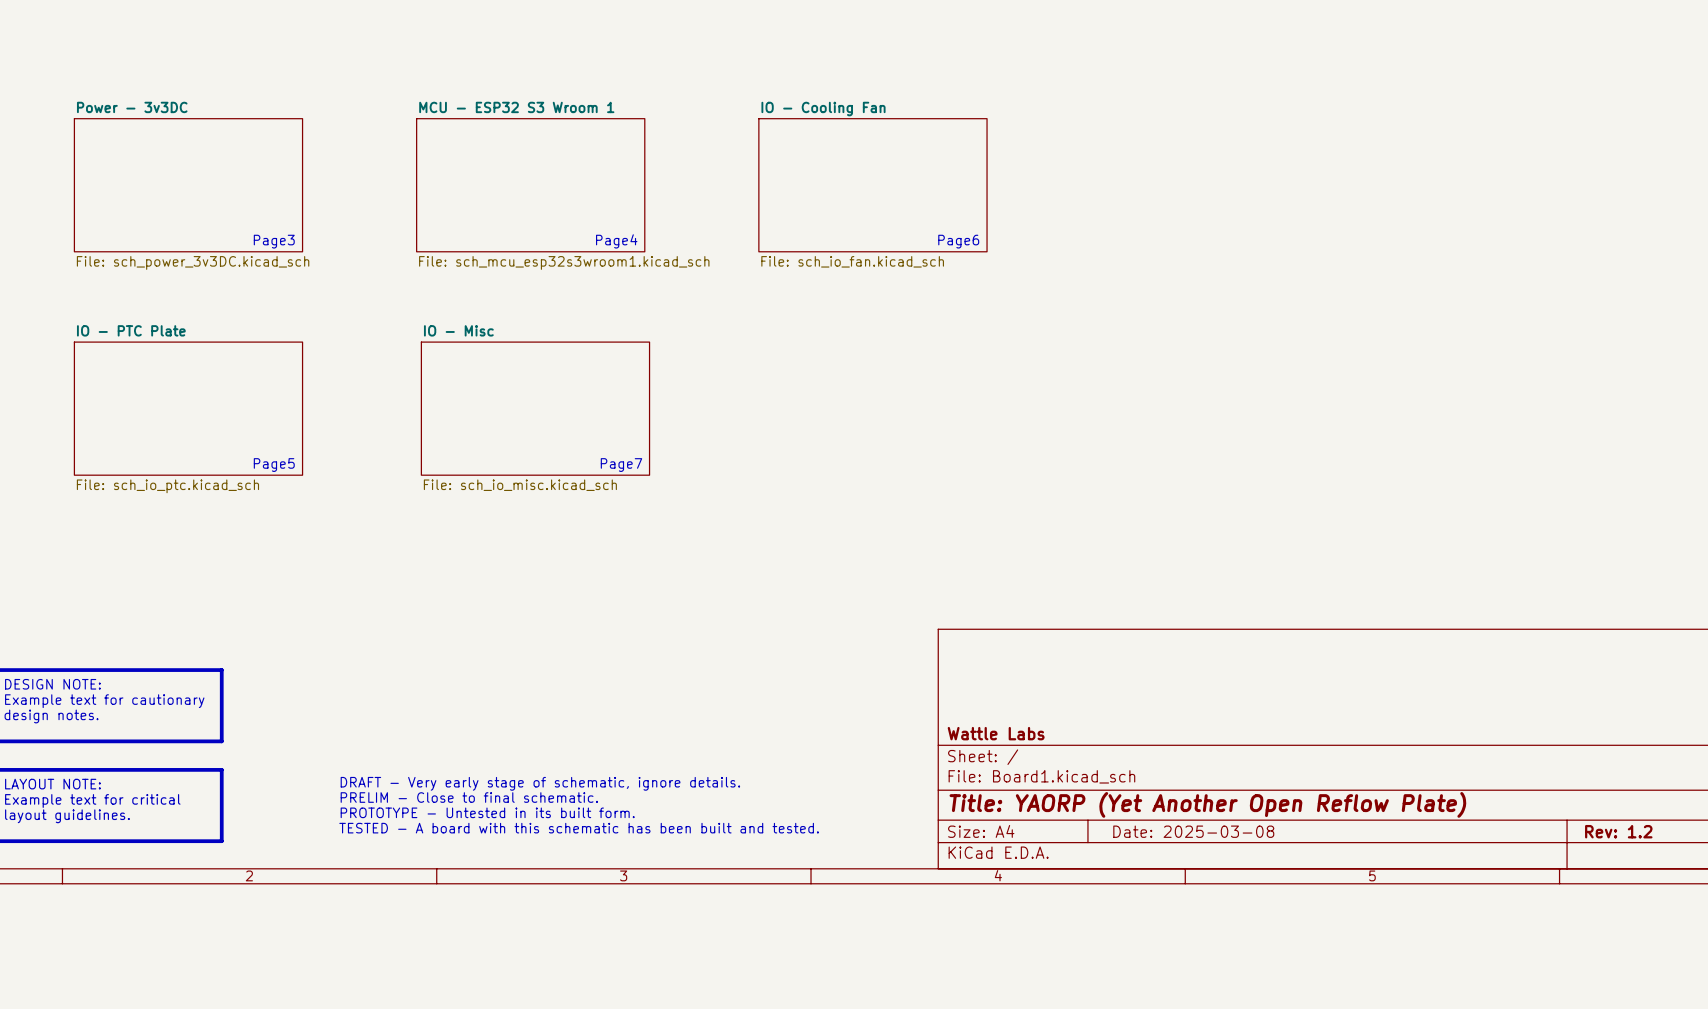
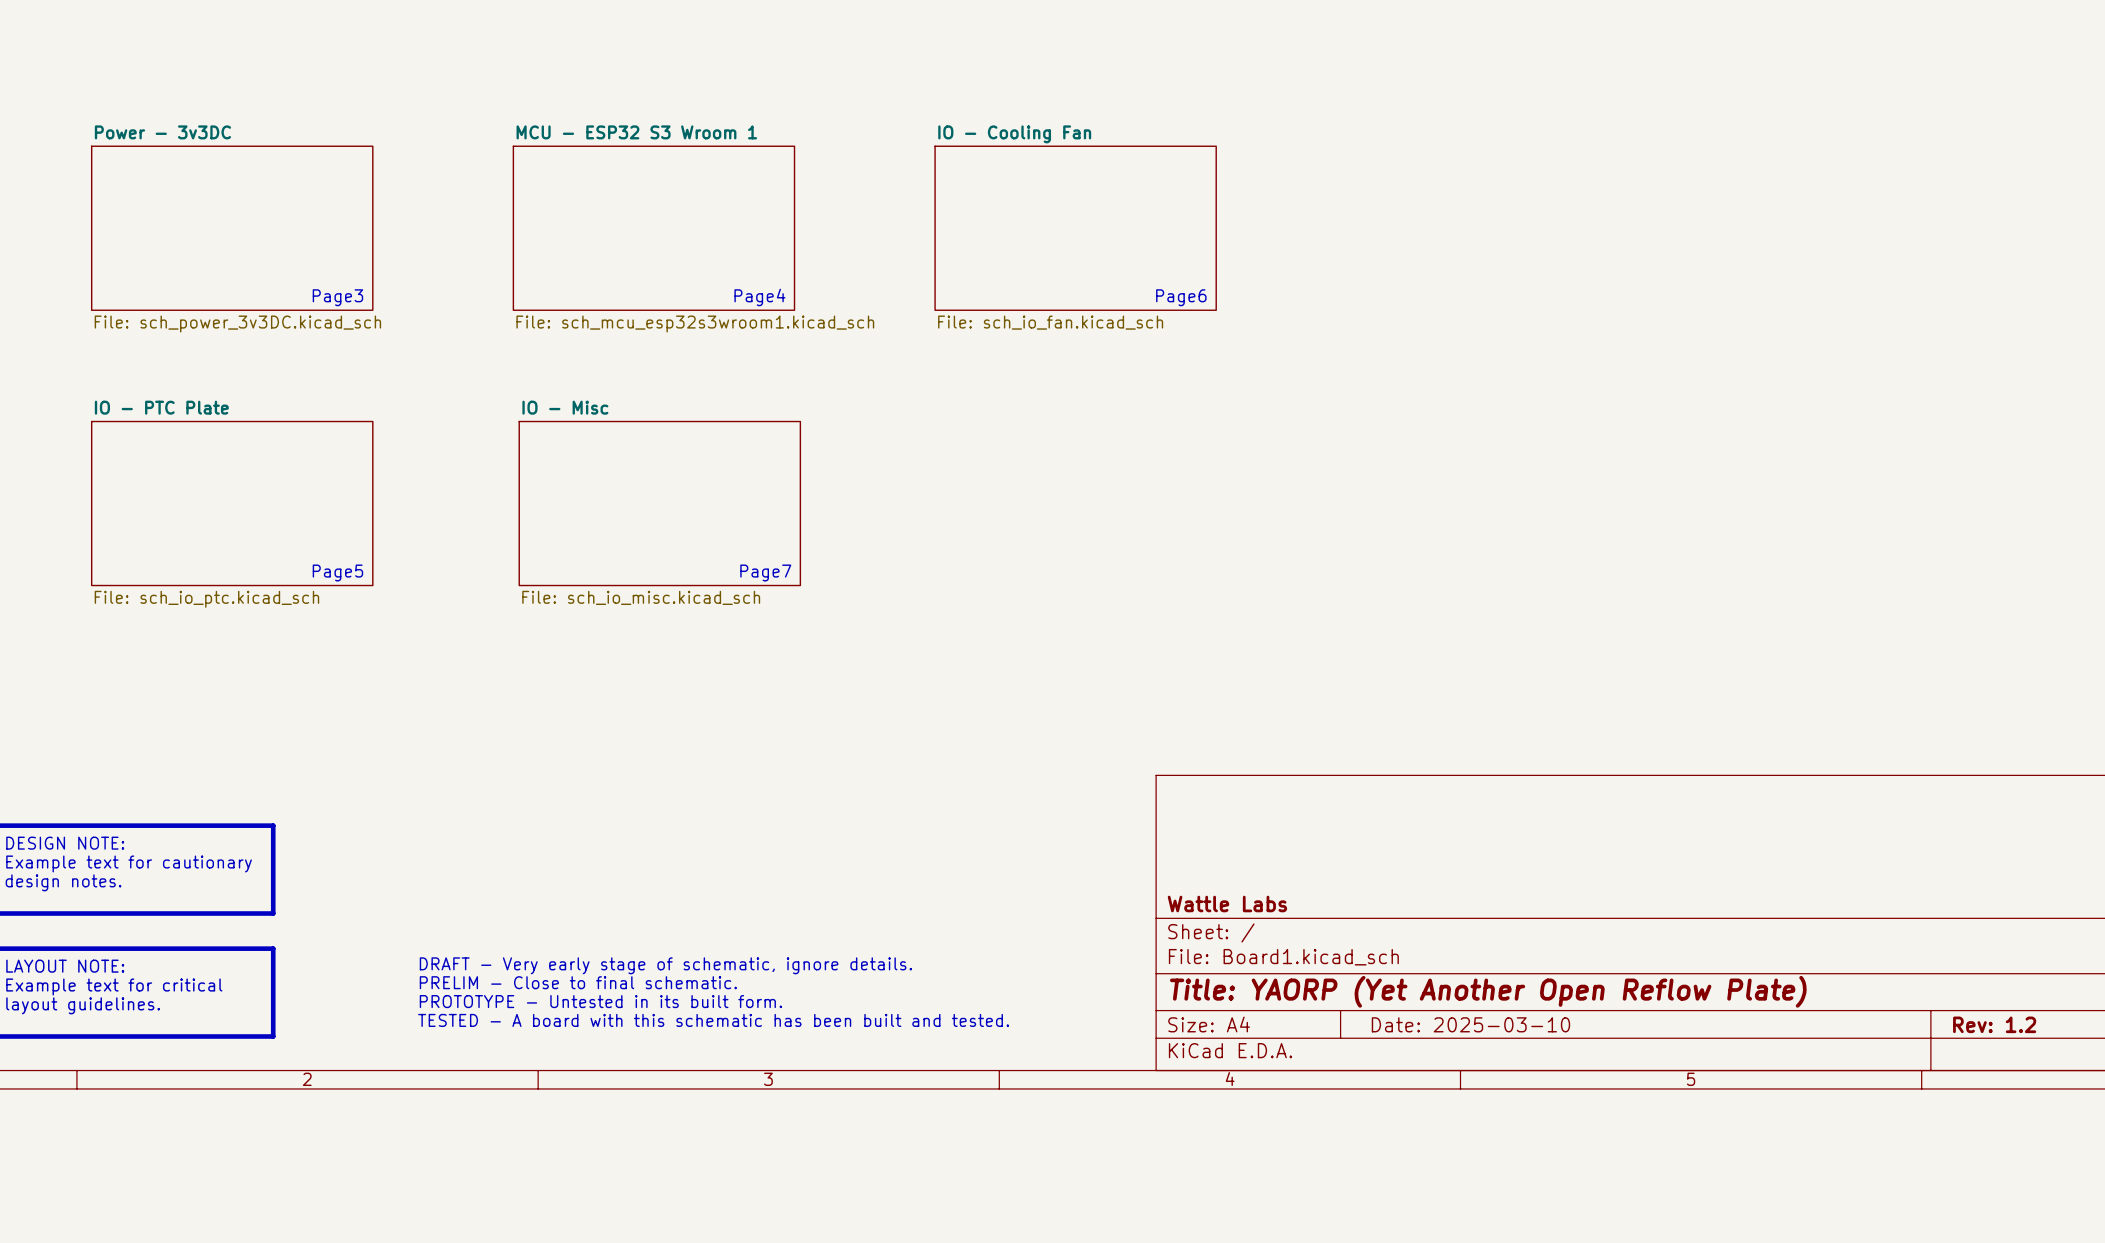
title block: Date: 2025-03-08 (1193, 831) -> Date: 2025-03-10 (1470, 1024)

